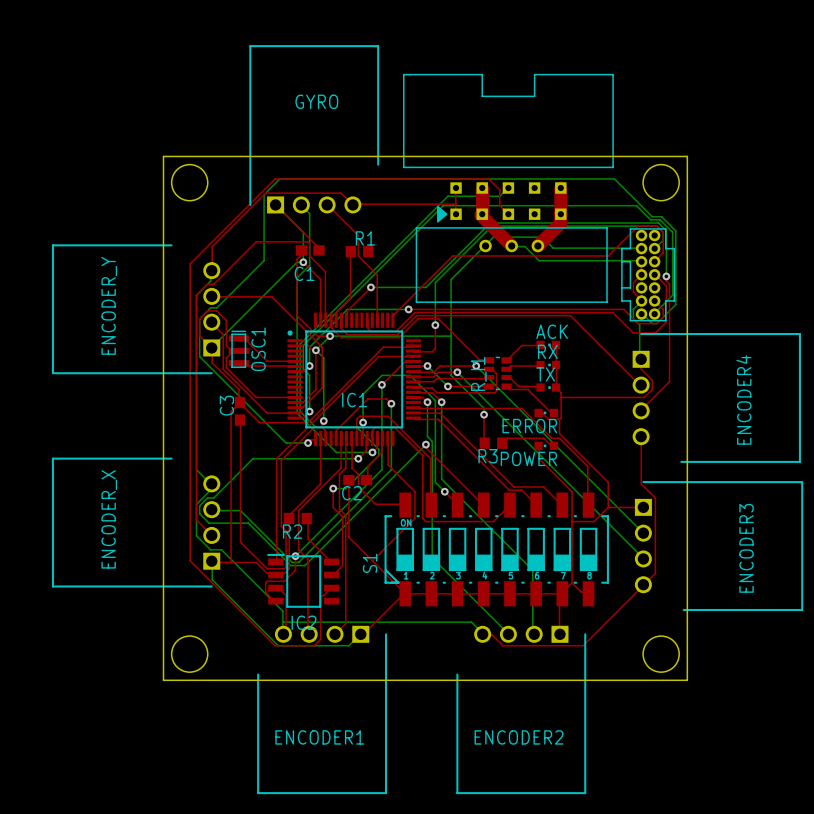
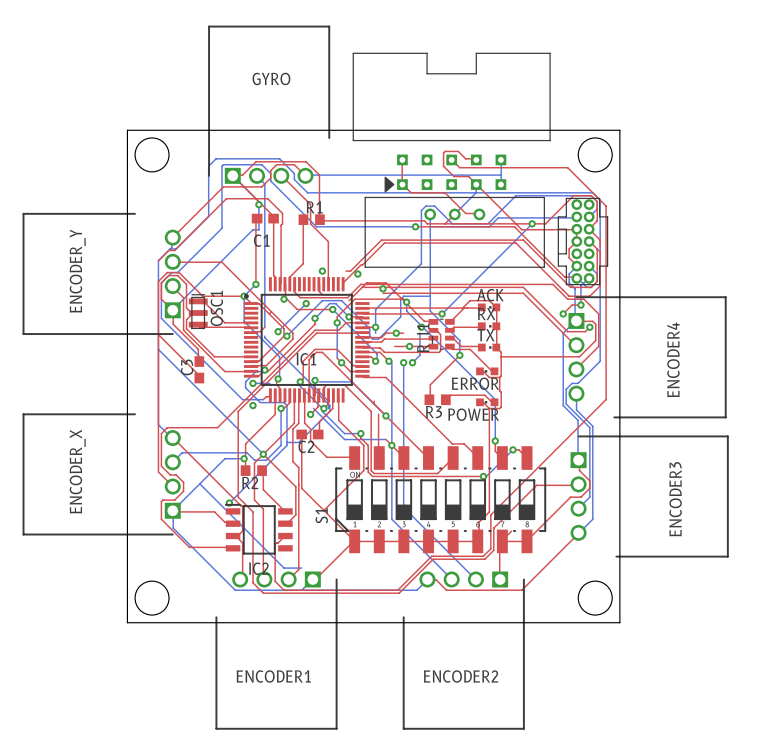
top track: (482, 188) (480, 215) (511, 245) -> (445, 223) (454, 214)
top track: none -> (451, 159) (459, 167) (567, 167) (606, 206) (606, 399) (545, 460)
bottom track: (508, 188) (499, 196) (447, 196) (300, 344) (300, 411) (314, 425) -> (253, 383) (269, 383)
top track: none -> (476, 159) (465, 158) (458, 151) (445, 151) (443, 161)
top track: (560, 188) (560, 223) (537, 245) -> (402, 184) (411, 192) (445, 192) (465, 213) (479, 214)
bottom track: none -> (500, 159) (500, 184)
top track: (499, 189) (488, 178) (275, 178) (190, 263) (190, 560) (199, 570) -> (354, 322) (346, 322) (338, 330) (315, 330) (217, 427) (167, 427) (161, 433) (161, 466) (170, 474) (176, 474) (183, 482) (183, 491) (174, 500) (161, 501) (161, 519)
bottom track: (265, 193) (279, 178) (614, 178) (652, 216) (661, 216) (675, 230) (675, 304) (663, 317) -> (223, 164) (261, 164) (270, 173) (270, 181) (316, 226) (415, 226)
top track: (322, 193) (265, 193) (212, 246) (212, 270) -> (276, 164) (270, 170) (270, 178) (261, 186) (223, 186) (173, 237)
top track: (499, 194) (499, 205) (508, 214) -> (443, 166) (453, 176) (468, 176) (521, 229) (576, 229)
top track: (455, 204) (352, 204) -> none
bottom track: none -> (501, 175) (305, 175)
bottom track: (490, 222) (425, 287) (370, 287) -> (434, 192) (307, 192) (294, 179) (294, 173) (279, 158) (216, 158) (208, 166) (208, 216) (176, 248) (170, 248)
bottom track: (576, 226) (491, 226) (480, 237) -> (515, 195) (487, 223) (452, 223) (434, 206) (425, 206)
top track: (256, 241) (308, 241) (309, 243) (309, 255) (325, 271) (325, 320) -> (214, 210) (226, 198) (267, 198) (282, 213) (280, 284)
bottom track: (476, 241) (435, 282) (435, 325) -> (421, 210) (421, 263) (375, 309) (375, 333)
bottom track: none -> (430, 214) (430, 311) (459, 340) (459, 355)
bottom track: (511, 245) (524, 246) (539, 260) (641, 261) -> (454, 214) (476, 192) (476, 184)
bottom track: (641, 248) (553, 248) (542, 237) (493, 237) (451, 279) (451, 375) (484, 408) (484, 414) -> (576, 216) (498, 217) (489, 226) (430, 226)
top track: (300, 255) (297, 259) (297, 315) (317, 336) (330, 336) -> (255, 223) (255, 284)
top track: (482, 255) (452, 255) (392, 315) (392, 318) -> (427, 223) (424, 220) (320, 220) (319, 175) (306, 161) (255, 161) (242, 175) (232, 175)
bottom track: none -> (532, 223) (442, 313)
via: none -> (532, 223)
top track: none -> (415, 226) (514, 226) (564, 277) (576, 278)
via: none -> (415, 226)
top track: none -> (589, 229) (600, 240) (600, 243)
top track: (303, 262) (320, 279) (320, 312) -> (273, 218) (275, 277)
via position: (303, 262) -> (258, 204)
bottom track: (309, 265) (297, 277) (297, 413) (330, 446) -> (264, 232) (264, 309)
via: (666, 276) -> none
top track: (666, 281) (669, 284) (669, 381) (664, 386) -> (360, 284) (552, 284) (567, 299) (583, 299) (598, 313) (598, 346)
top track: (370, 287) (347, 311) (346, 320) -> none
via position: (370, 287) -> (322, 271)
top track: (196, 295) (196, 317) -> (251, 303) (244, 296) (202, 296) (179, 272) (167, 272) (158, 281)
top track: (264, 296) (271, 296) (322, 347) (322, 388) (303, 406) -> (221, 262) (292, 333) (292, 339) (266, 365) (258, 365)
top track: (654, 300) (663, 309) -> (597, 248) (597, 274)
bottom track: none -> (589, 266) (597, 274) (597, 281)
top track: (408, 309) (623, 309) (638, 323) -> (346, 271) (350, 271) (381, 240) (523, 240) (570, 287) (573, 287)
bottom track: (408, 309) (347, 309) (309, 347) -> none
top track: (612, 312) (414, 312) (396, 331) -> (549, 277) (515, 243) (384, 243) (343, 282)
bottom track: (654, 314) (672, 295) (672, 232) (660, 219) (650, 219) (636, 205) (443, 205) (303, 345) (303, 369) (309, 375) -> (589, 278) (580, 285) (580, 305)
bottom track: none -> (255, 284) (244, 296) (244, 321) (279, 356) (279, 378)
via: none -> (255, 284)
top track: (411, 320) (416, 315) (570, 315) (584, 329) -> (383, 293) (523, 293)
top track: none -> (362, 287) (523, 287) (567, 331) (585, 331) (589, 327)
top track: (435, 325) (435, 348) (432, 351) -> (442, 313) (380, 313)
top track: (331, 328) (341, 337) (399, 337) -> (285, 291) (285, 297) (297, 309) (332, 309)
via: none -> (244, 296)
bottom track: none -> (430, 296) (403, 296) (400, 299) (400, 316) (378, 339) (372, 339) (369, 336) (369, 328) (341, 300) (322, 300) (286, 336)
bottom track: (451, 336) (330, 336) (315, 350) (323, 358) (323, 421) -> none
top track: none -> (406, 302) (403, 299) (354, 299) (337, 316) (337, 322)
bottom track: none -> (406, 302) (406, 311) (495, 399) (495, 441)
via: none -> (406, 302)
bottom track: none -> (306, 303) (278, 331)
via: none -> (306, 303)
top track: none -> (580, 305) (572, 305) (563, 313)
via: none -> (580, 305)
top track: (413, 345) (383, 347) (308, 422) (259, 422) (240, 402) (231, 411) (231, 562) -> (362, 308) (462, 308) (470, 300) (489, 300) (496, 307)
via: none -> (332, 309)
via: (315, 350) -> none
via: none -> (442, 313)
via: none -> (563, 313)
top track: (315, 353) (315, 389) -> (270, 315) (284, 328) (284, 336)
bottom track: none -> (349, 316) (335, 303) (329, 303) (315, 318)
via: none -> (349, 316)
top track: none -> (315, 318) (315, 324) (267, 371) (264, 371)
via: none -> (315, 318)
top track: (413, 356) (378, 356) (276, 458) (275, 561) -> (362, 318) (349, 316)
top track: (641, 359) (641, 369) (652, 380) (652, 389) -> (576, 321) (592, 321) (595, 324) (595, 340) (586, 349)
bottom track: none -> (576, 320) (563, 333) (563, 405) (578, 420) (578, 460)
bottom track: none -> (337, 322) (337, 358)
via: none -> (337, 322)
top track: (405, 361) (381, 384) -> none
via: (309, 366) -> none
bottom track: (427, 366) (447, 386) -> none
top track: (476, 366) (440, 366) (433, 372) (413, 371) -> none
bottom track: (476, 366) (643, 533) -> none
via: none -> (589, 327)
via: none -> (278, 331)
via: none -> (396, 333)
bottom track: (457, 372) (643, 558) -> (600, 243) (600, 361) (578, 383) (572, 383) (566, 389) (566, 404) (589, 427) (589, 497) (578, 508)
via: (457, 372) -> none
bottom track: none -> (419, 333) (419, 355) (412, 362)
top track: none -> (158, 334) (198, 374) (199, 378)
top track: none -> (284, 336) (270, 349)
via: none -> (286, 336)
bottom track: (410, 375) (381, 375) (363, 394) (363, 422) -> (359, 336) (332, 309)
bottom track: (309, 377) (309, 411) -> (264, 337) (328, 401) (328, 408)
bottom track: (381, 384) (381, 469) (295, 556) -> none
via: (381, 384) -> none
via: (447, 386) -> none
via: none -> (409, 346)
bottom track: none -> (158, 349) (263, 454)
bottom track: (429, 394) (435, 400) (435, 482) (444, 491) -> (377, 353) (377, 362)
via: none -> (459, 355)
top track: (386, 399) (367, 399) (336, 430) (336, 438) -> (281, 408) (284, 408) (289, 402) (289, 395)
bottom track: (427, 402) (427, 436) (432, 441) (432, 557) (444, 570) -> (391, 362) (391, 519)
bottom track: (441, 402) (441, 479) (532, 570) (532, 633) -> (403, 362) (403, 507) (474, 578)
top track: none -> (341, 362) (350, 371) (362, 371)
bottom track: (391, 403) (391, 469) (298, 562) (292, 562) (240, 510) (211, 509) -> (281, 408) (281, 445) (266, 460) (254, 460) (247, 452) (182, 452) (172, 462)
via: none -> (403, 362)
via: none -> (412, 362)
top track: (413, 407) (521, 408) (551, 438) (559, 438) (587, 466) (587, 504) -> (513, 449) (518, 449) (526, 457)
top track: none -> (362, 366) (353, 365) (337, 349) (315, 349) (303, 361) (303, 378) (300, 381)
top track: (413, 412) (440, 413) (513, 487) (543, 487) (554, 498) -> (495, 441) (495, 451)
bottom track: none -> (264, 371) (255, 371) (245, 381) (245, 387) (260, 402) (284, 402)
top track: (484, 414) (484, 443) -> (459, 355) (430, 384) (429, 399)
via: (484, 414) -> none
top track: (356, 419) (359, 416) (388, 416) (430, 458) -> (309, 377) (309, 359) (316, 352) (322, 352) (374, 404)
top track: (240, 420) (240, 542) (267, 568) (286, 567) -> (233, 536) (236, 537) (242, 531) (242, 516)
bottom track: none -> (300, 381) (300, 386) (344, 433) (360, 433)
via: none -> (300, 381)
bottom track: none -> (319, 381) (351, 381) (385, 415)
via: none -> (253, 383)
top track: (322, 427) (314, 427) (281, 460) -> (362, 332) (316, 333) (238, 411) (238, 415)
top track: (561, 435) (608, 482) (608, 507) (643, 507) -> (501, 392) (501, 407) (489, 408)
top track: (641, 436) (641, 483) (655, 498) (655, 529) -> (578, 460) (579, 470) (589, 480)
bottom track: none -> (576, 393) (576, 409) (592, 426) (592, 519) (578, 532)
via: (308, 443) -> none
bottom track: (425, 444) (304, 565) (290, 565) (248, 523) (209, 523) (199, 513) (199, 505) (207, 498) (213, 498) (253, 458) (358, 458) -> none
via: (425, 444) -> none
top track: (539, 446) (539, 458) (572, 491) (572, 582) (581, 592) (588, 593) -> (480, 402) (483, 402) (489, 408)
via: none -> (253, 405)
bottom track: (333, 449) (336, 452) (372, 452) -> (286, 405) (286, 445) (229, 503)
via: none -> (281, 408)
bottom track: none -> (313, 408) (344, 439) (385, 439)
top track: (320, 458) (320, 483) (289, 515) -> (275, 414) (245, 443) (245, 467)
via: none -> (385, 415)
top track: none -> (360, 433) (360, 438) (368, 445) (368, 472) (372, 476) (483, 476)
via: none -> (360, 433)
bottom track: (210, 483) (210, 490) (196, 504) (196, 535) (210, 549) (221, 549) (282, 611) (283, 634) -> none
top track: none -> (385, 439) (391, 445)
via: none -> (495, 441)
top track: (333, 488) (333, 507) (342, 516) (342, 535) -> (263, 454) (295, 486)
via: (333, 488) -> none
bottom track: none -> (513, 449) (486, 476) (483, 476)
via: none -> (513, 449)
via: none -> (263, 454)
bottom track: none -> (244, 458) (224, 458) (172, 510)
via: none -> (244, 458)
top track: (289, 518) (289, 568) (284, 573) (275, 574) -> none
top track: (572, 521) (594, 521) -> (275, 581) (284, 590) (397, 590) (431, 556) (483, 556) (490, 548) (490, 514) (532, 473)
via: none -> (483, 476)
top track: (281, 526) (286, 531) (286, 556) -> (172, 438) (242, 506)
top track: none -> (238, 477) (238, 497) (253, 511) (253, 582) (263, 593) (399, 593) (433, 559) (484, 559) (493, 550) (493, 528) (536, 485) (578, 484)
top track: (655, 537) (655, 573) (643, 584) -> (589, 488) (580, 497) (570, 497) (527, 541) (502, 541)
top track: (295, 556) (295, 570) (284, 581) (265, 582) (265, 592) (275, 601) -> none
via position: (295, 556) -> (229, 503)
top track: (536, 593) (561, 593) -> (477, 541) (479, 522) (489, 511) (489, 408)
top track: (229, 600) (275, 645) (314, 645) (320, 639) (320, 636) -> (189, 547) (233, 548)
bottom track: (282, 622) (330, 622) -> (199, 483) (284, 568)
bottom track: (348, 622) (471, 622) (482, 634) -> (301, 590) (416, 590) (427, 579)

